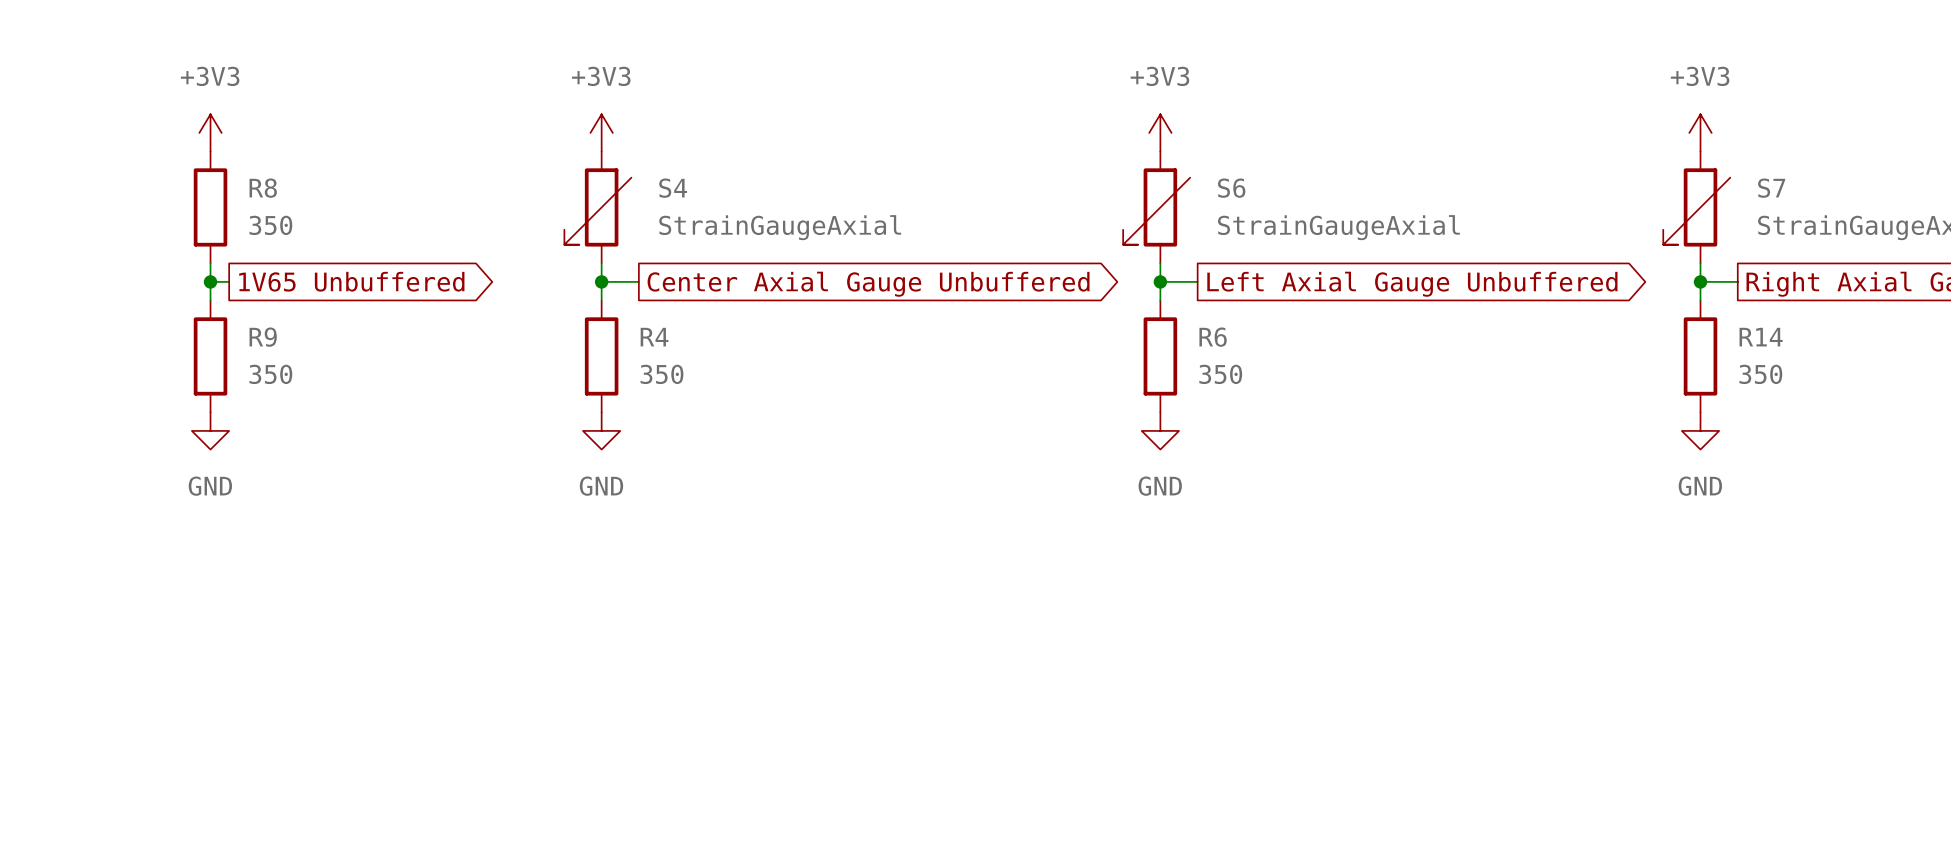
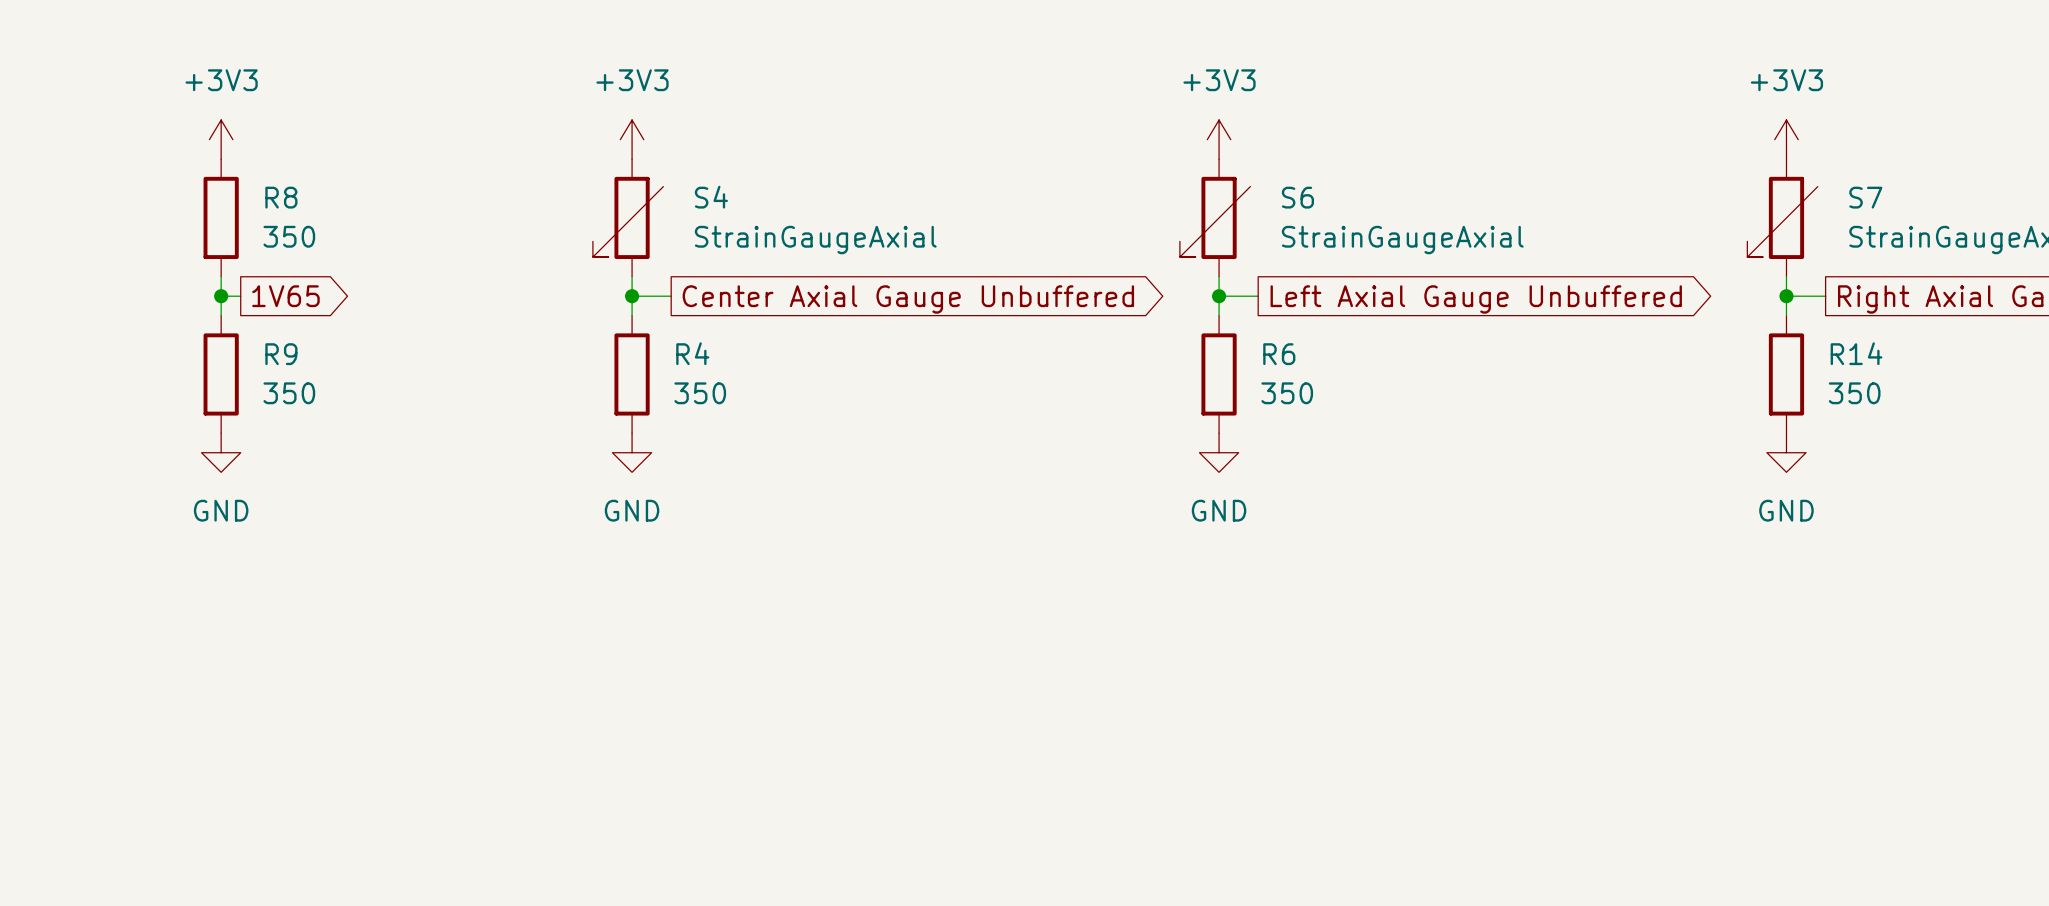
global label: 1V65 Unbuffered (351, 281) -> 1V65 (285, 296)

